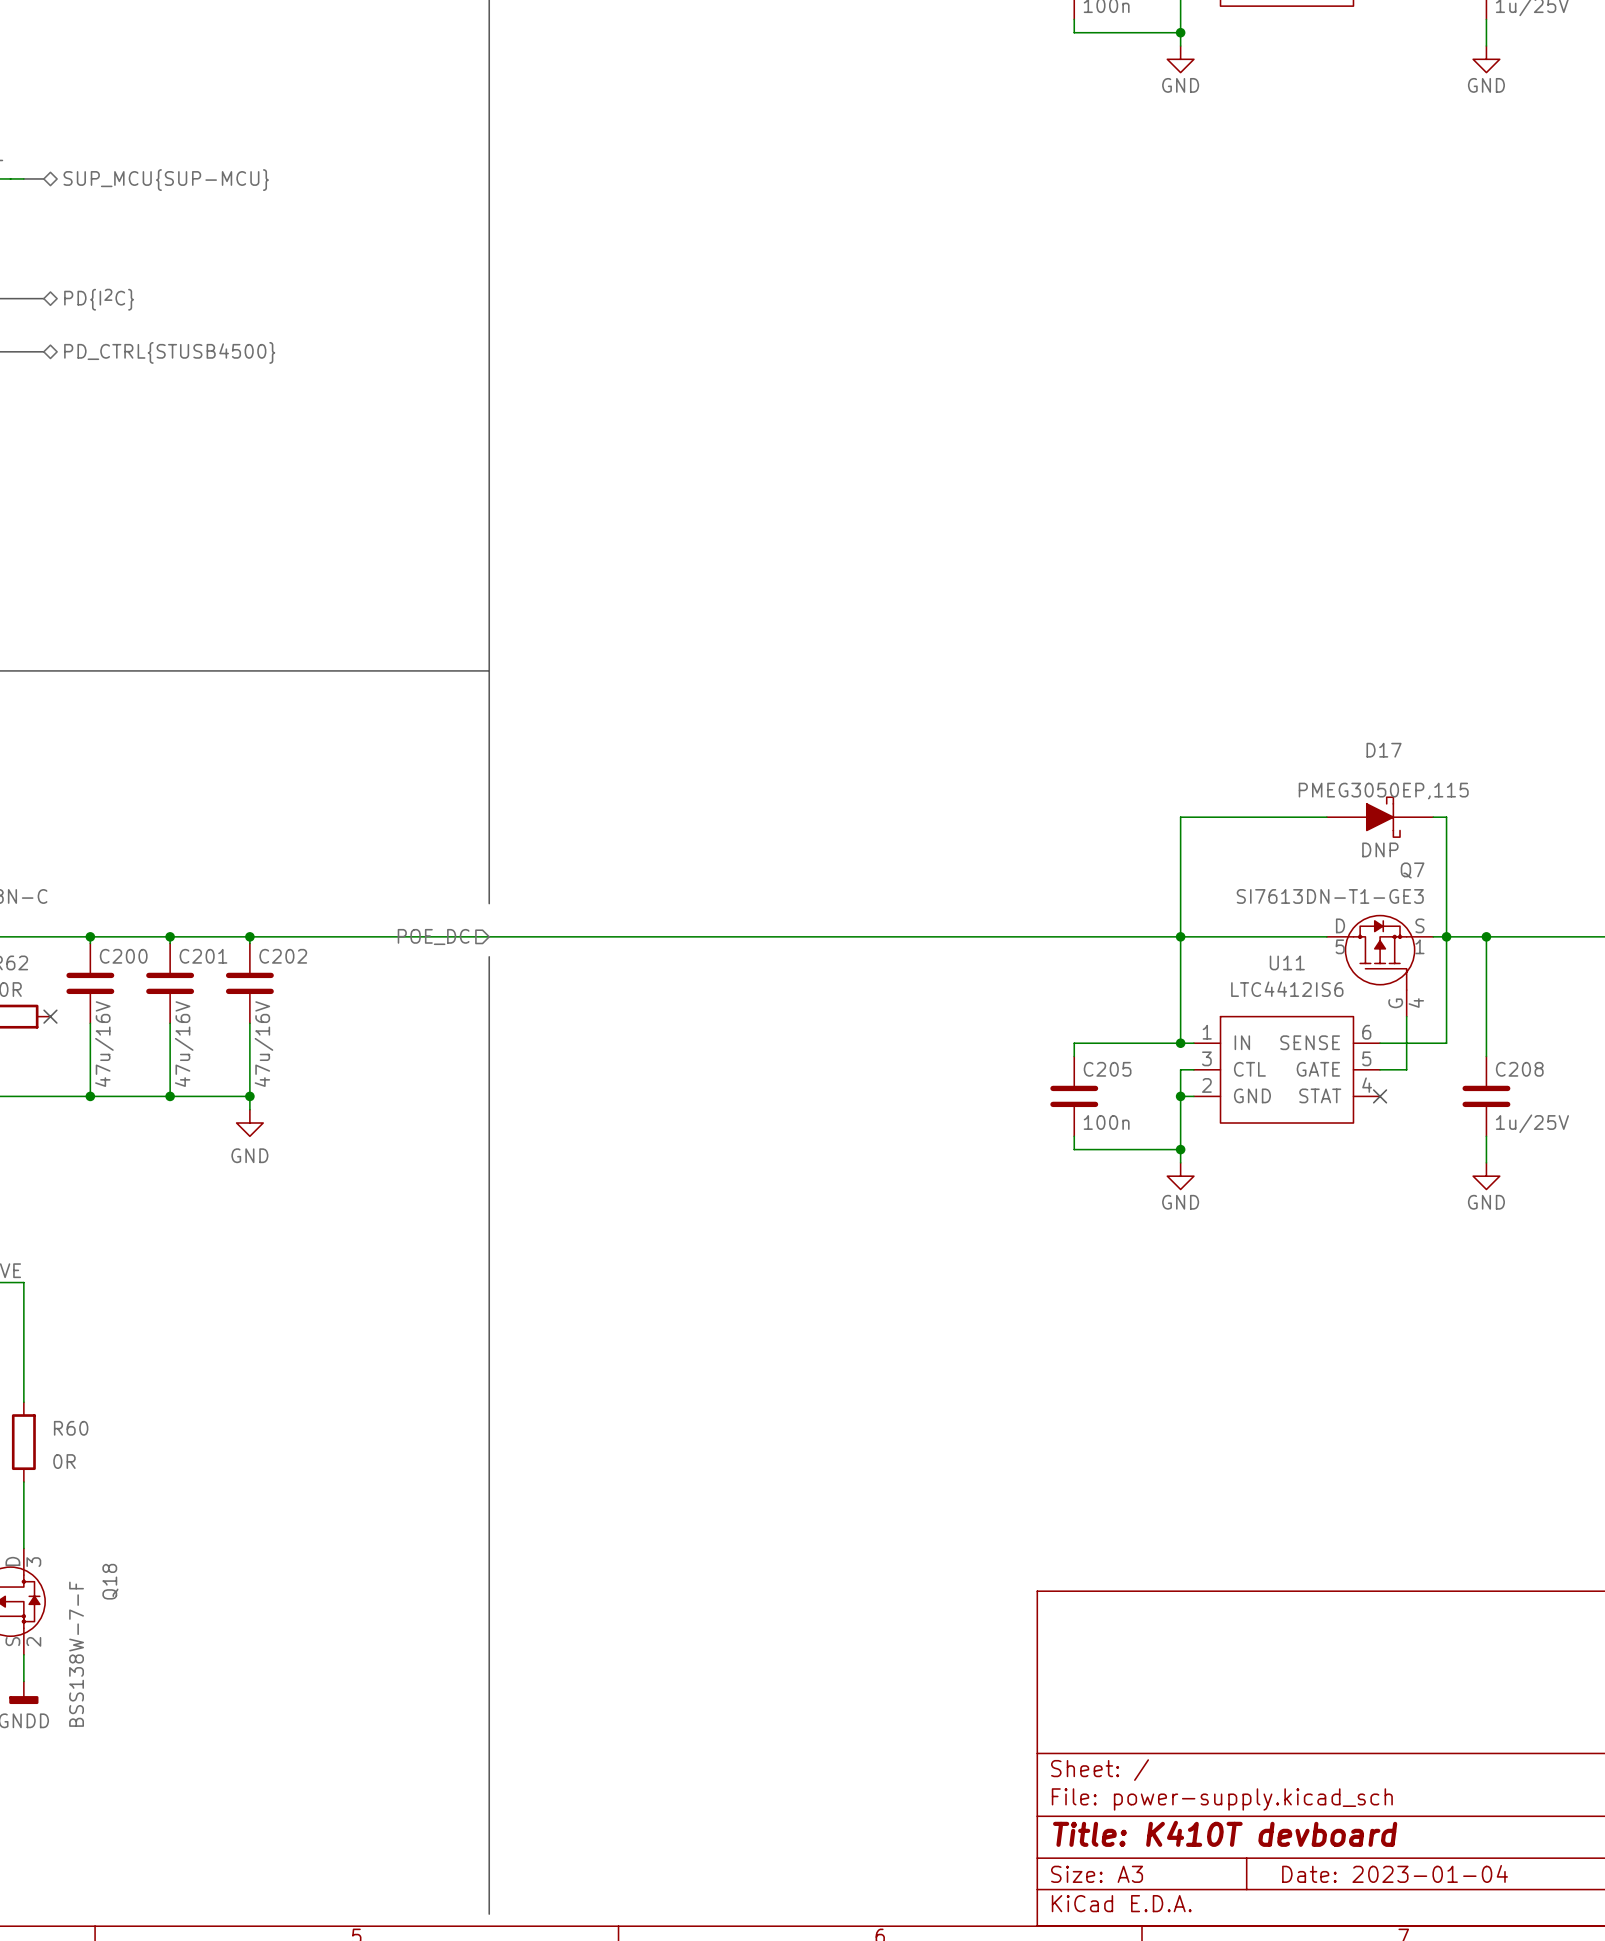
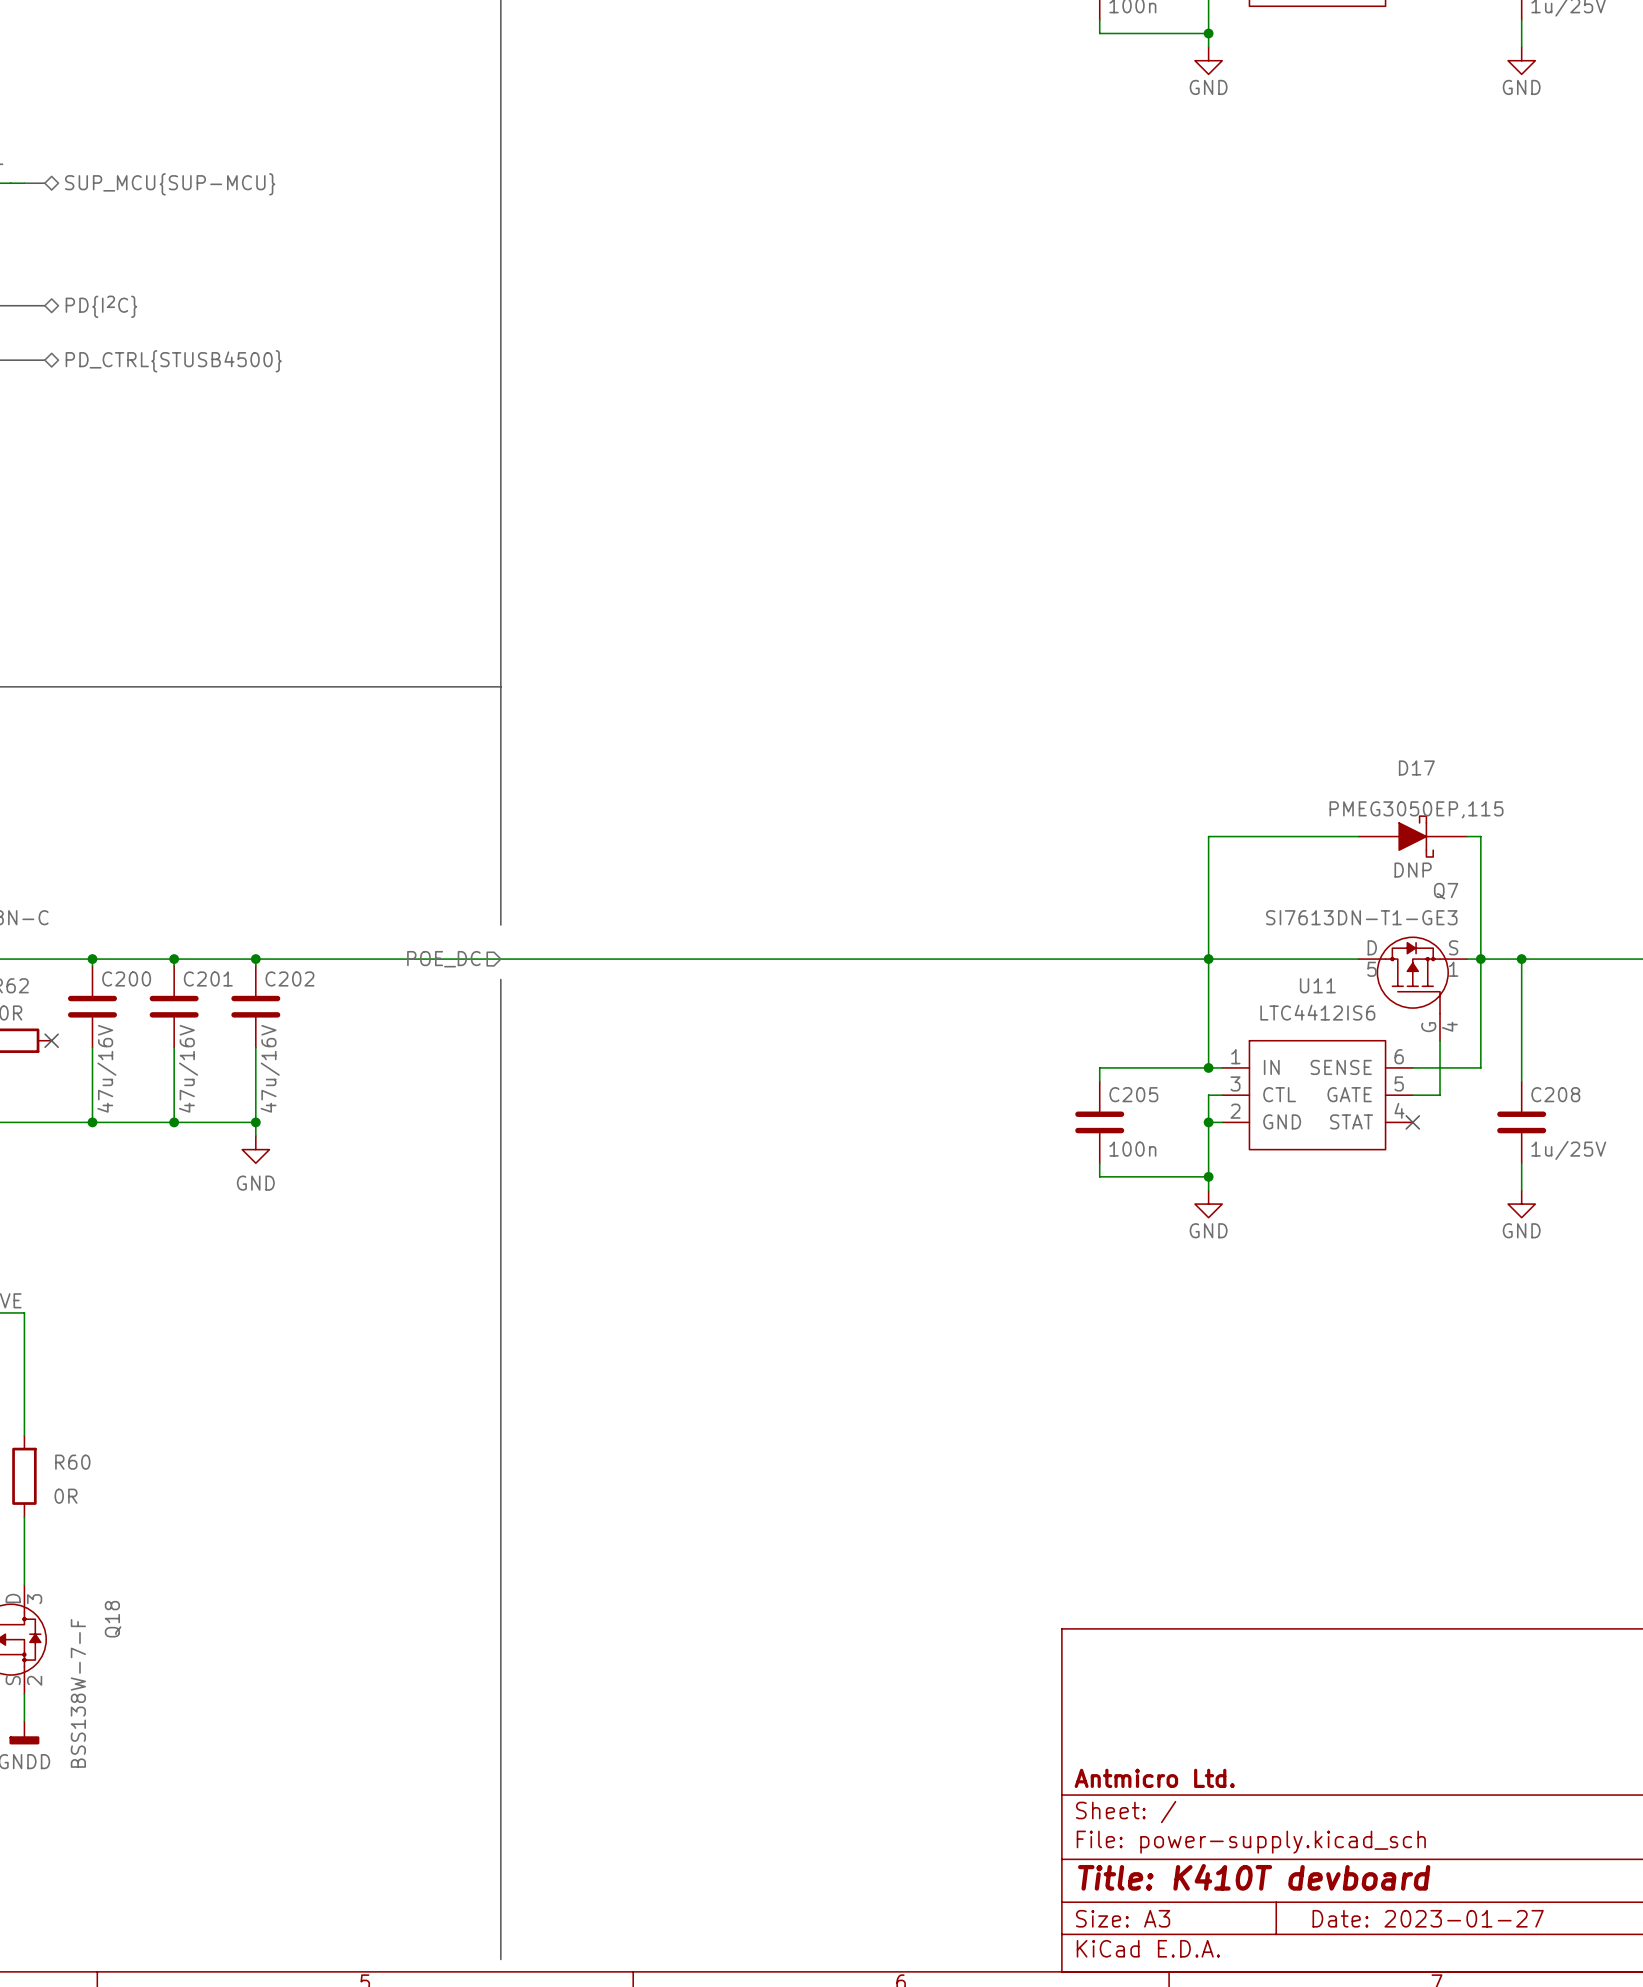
title block: none -> Antmicro Ltd. (1154, 1778)
title block: Date: 2023-01-04 (1395, 1873) -> Date: 2023-01-27 (1428, 1918)

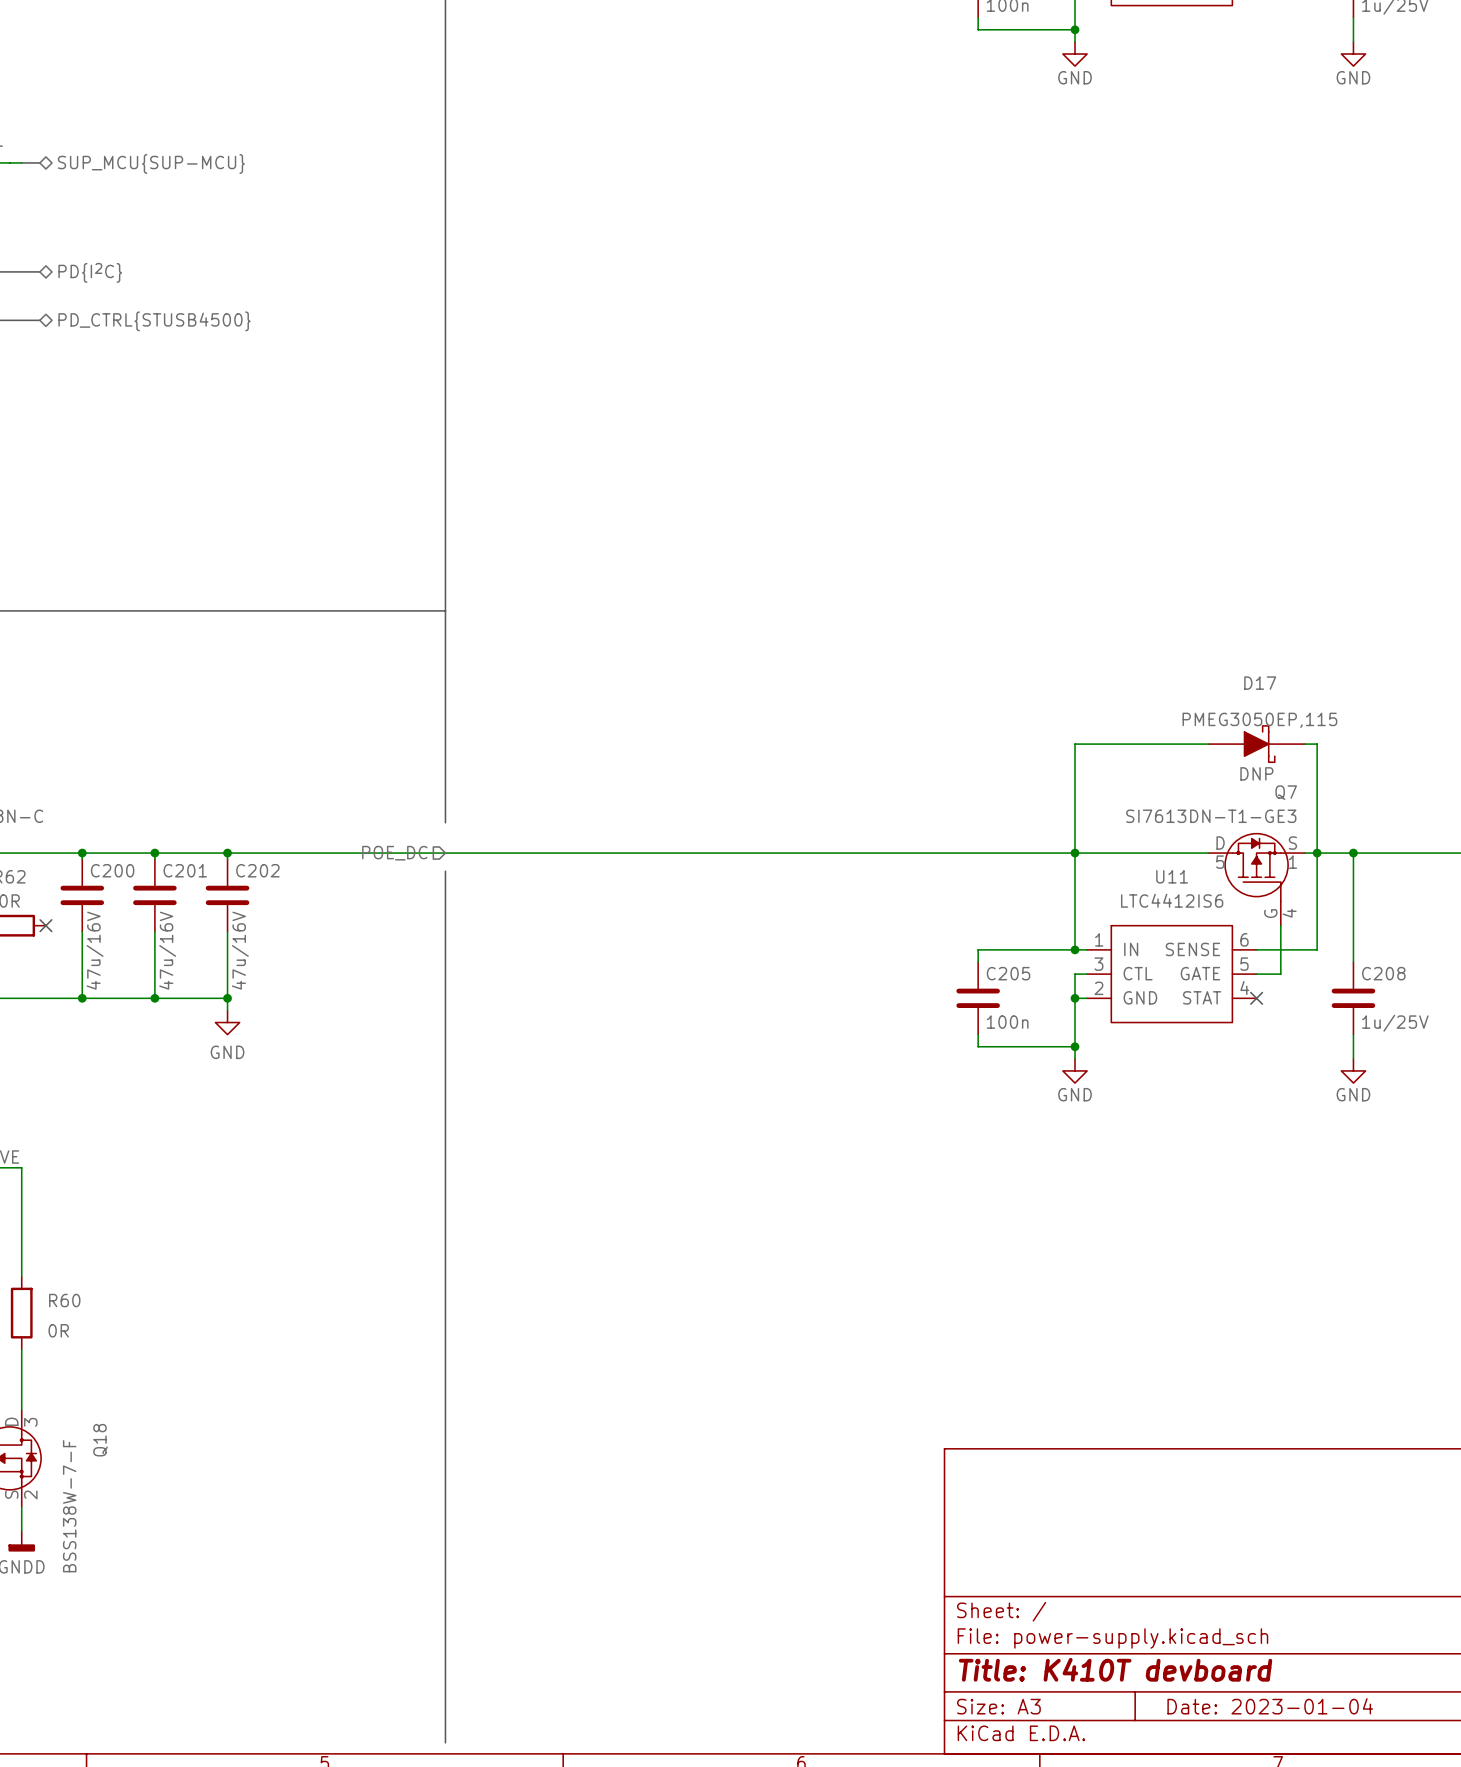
title block: Antmicro Ltd. (1154, 1778) -> none
title block: Date: 2023-01-27 (1428, 1918) -> Date: 2023-01-04 (1270, 1706)

